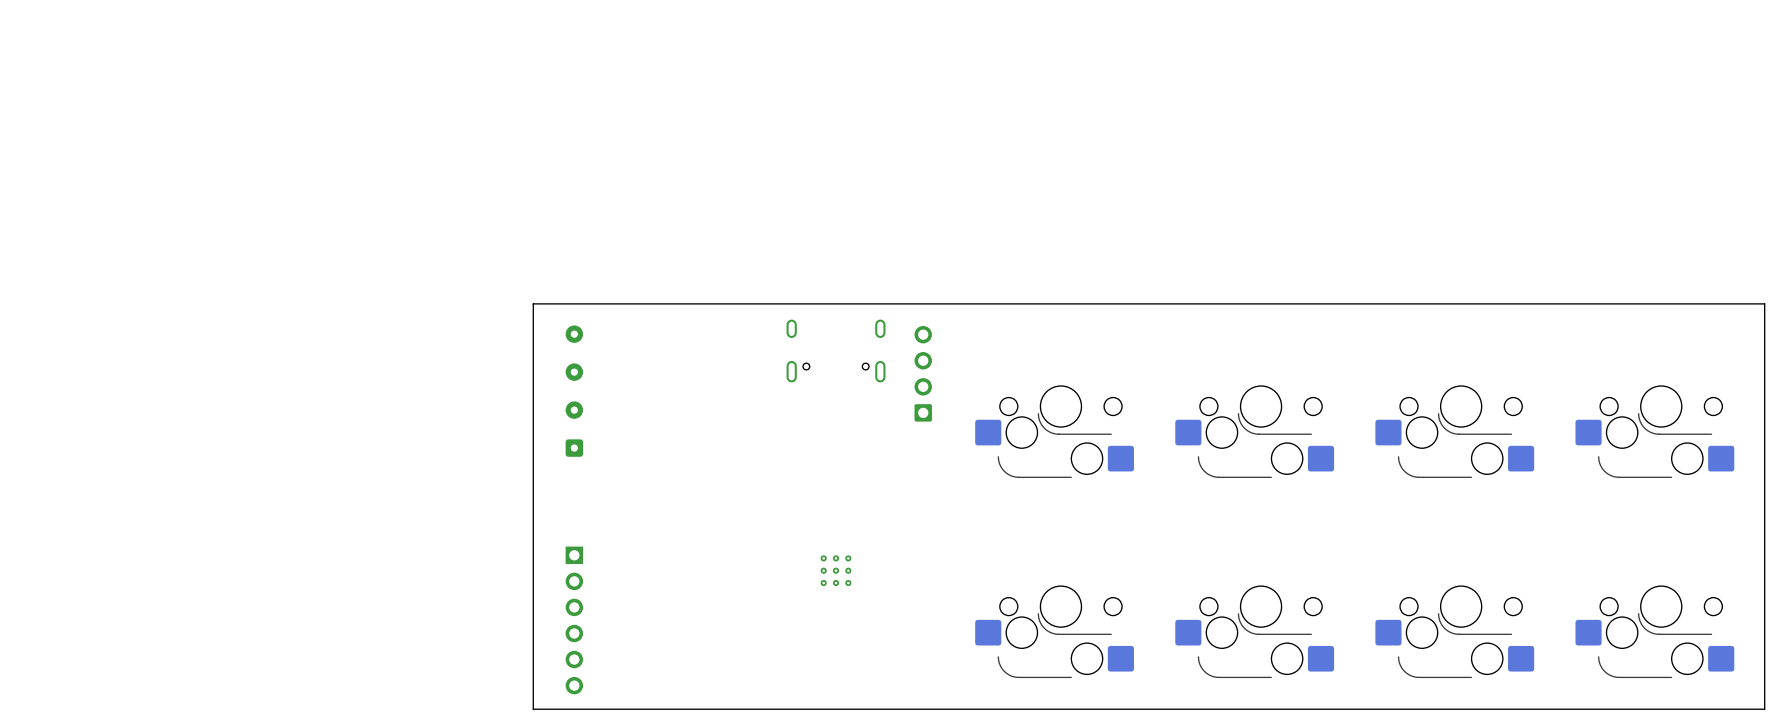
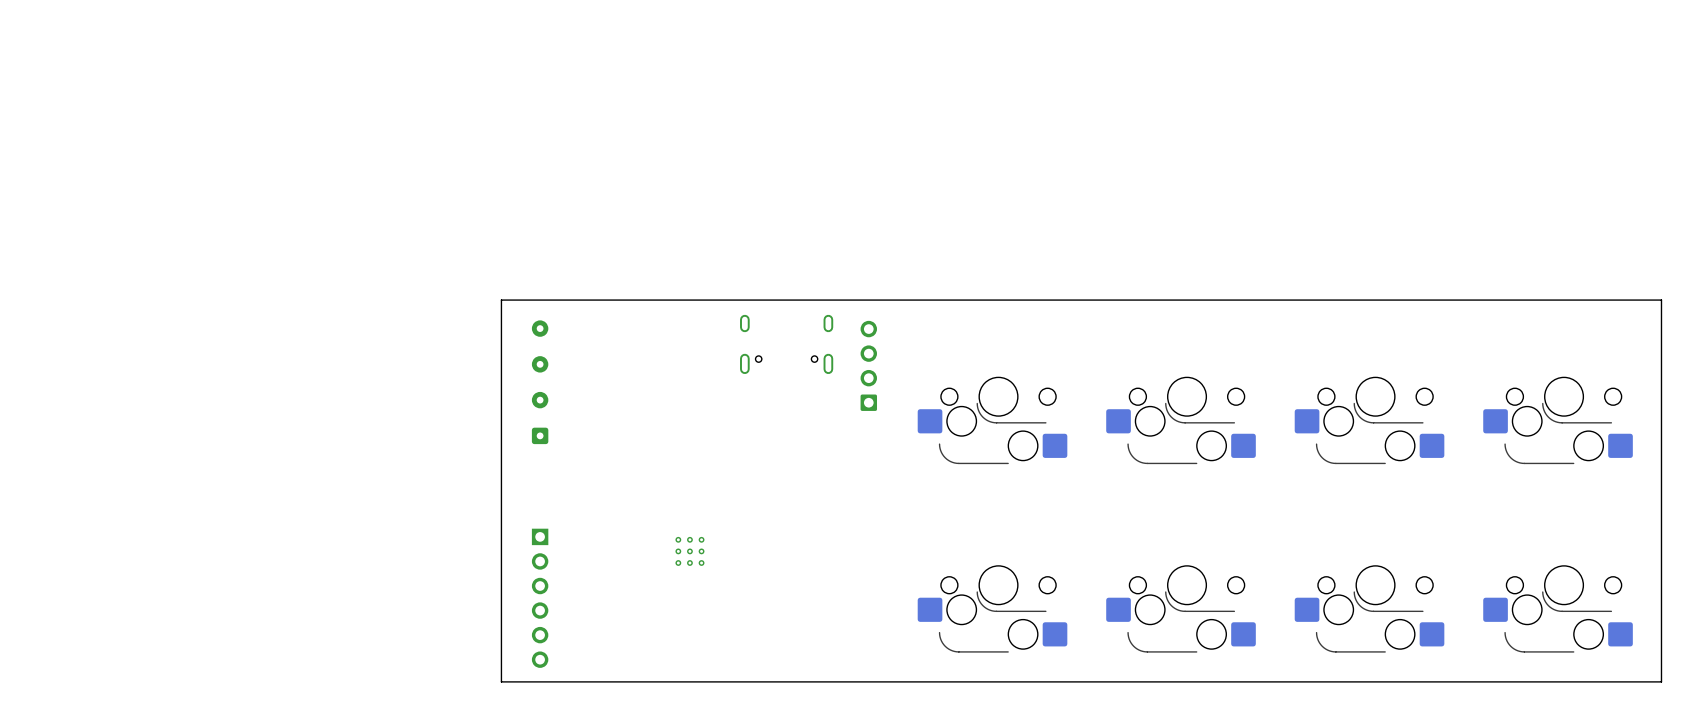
part: none -> (689, 551)
part: (836, 570) -> none

